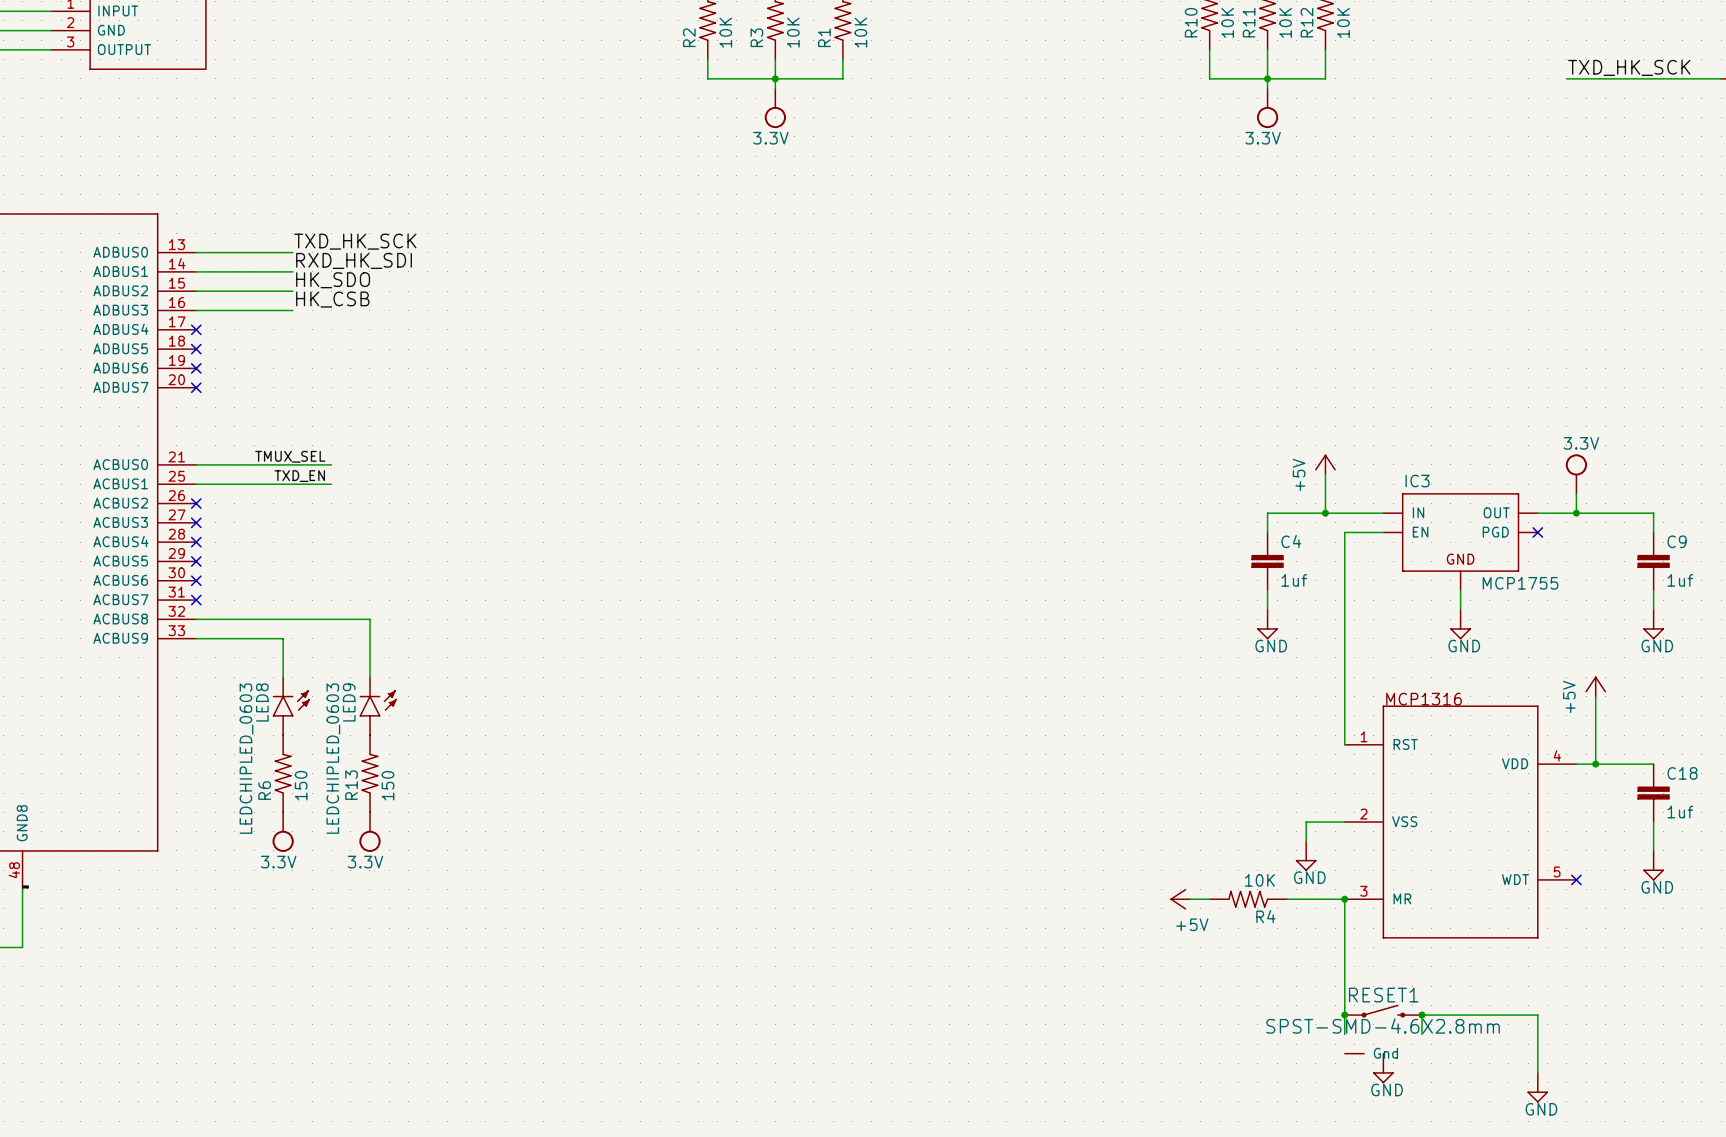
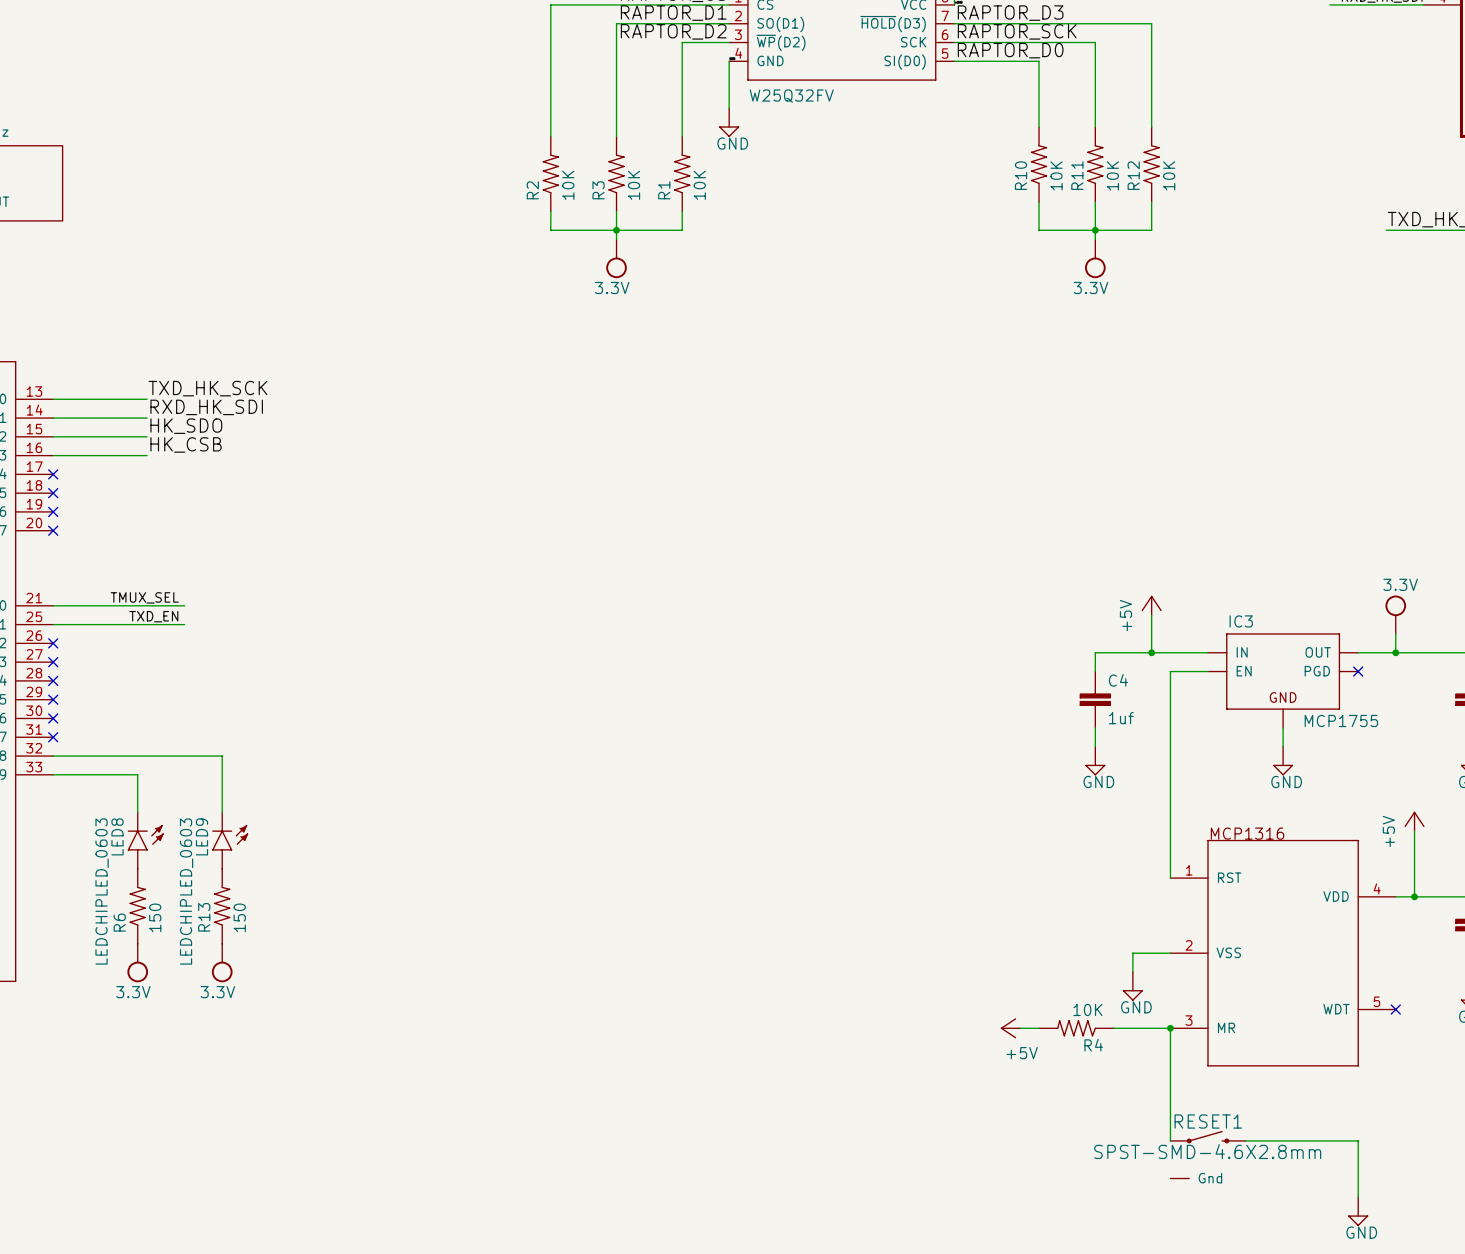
wire: (1344, 1015) (1344, 1034) -> none
junction: (1344, 1015) -> none
wire: (1421, 1015) (1421, 1034) -> none
junction: (1421, 1015) -> none
power symbol: GND (1383, 1068) -> none

